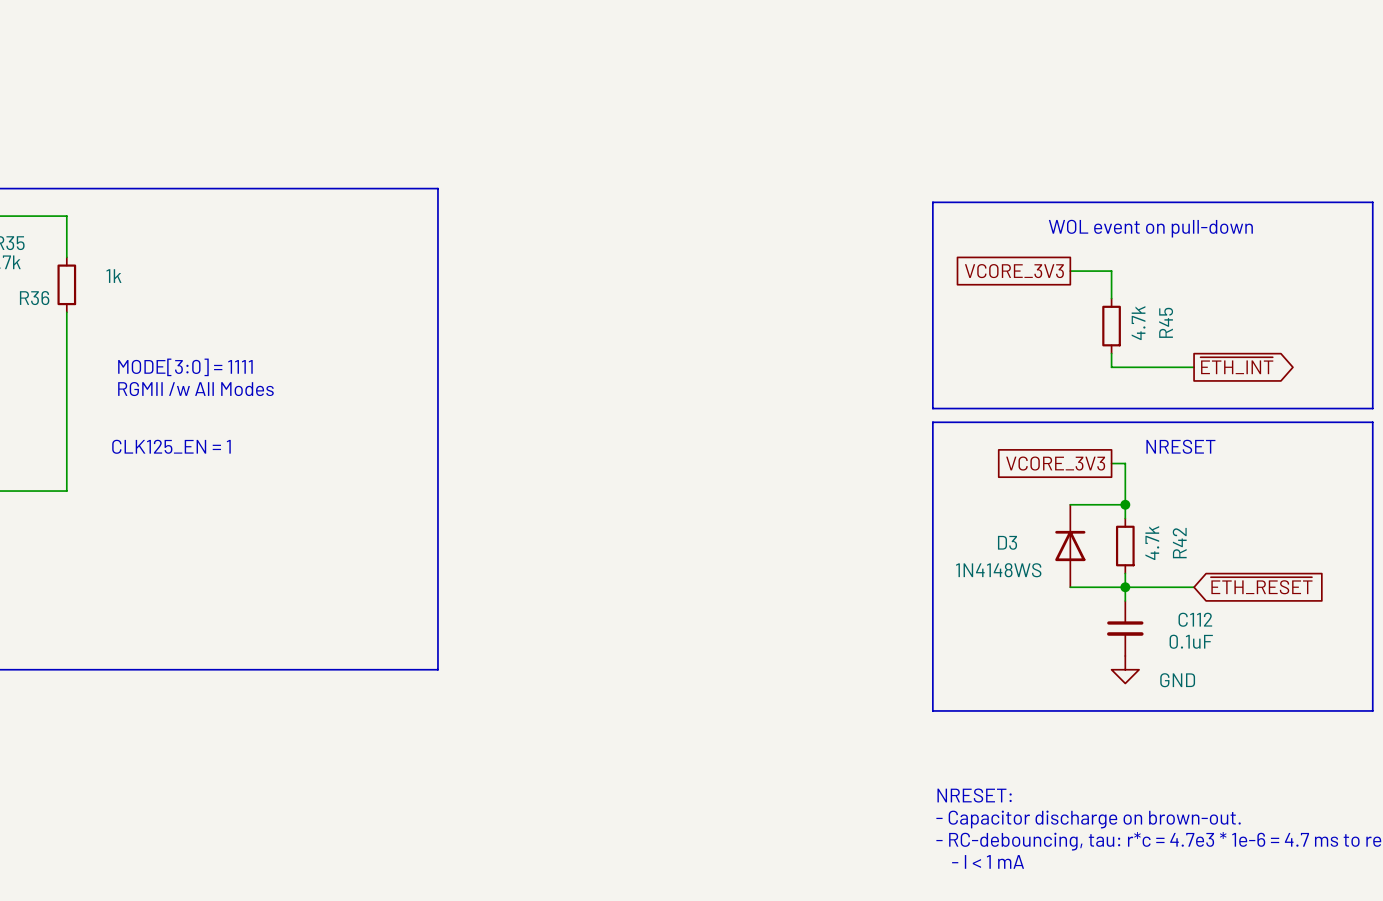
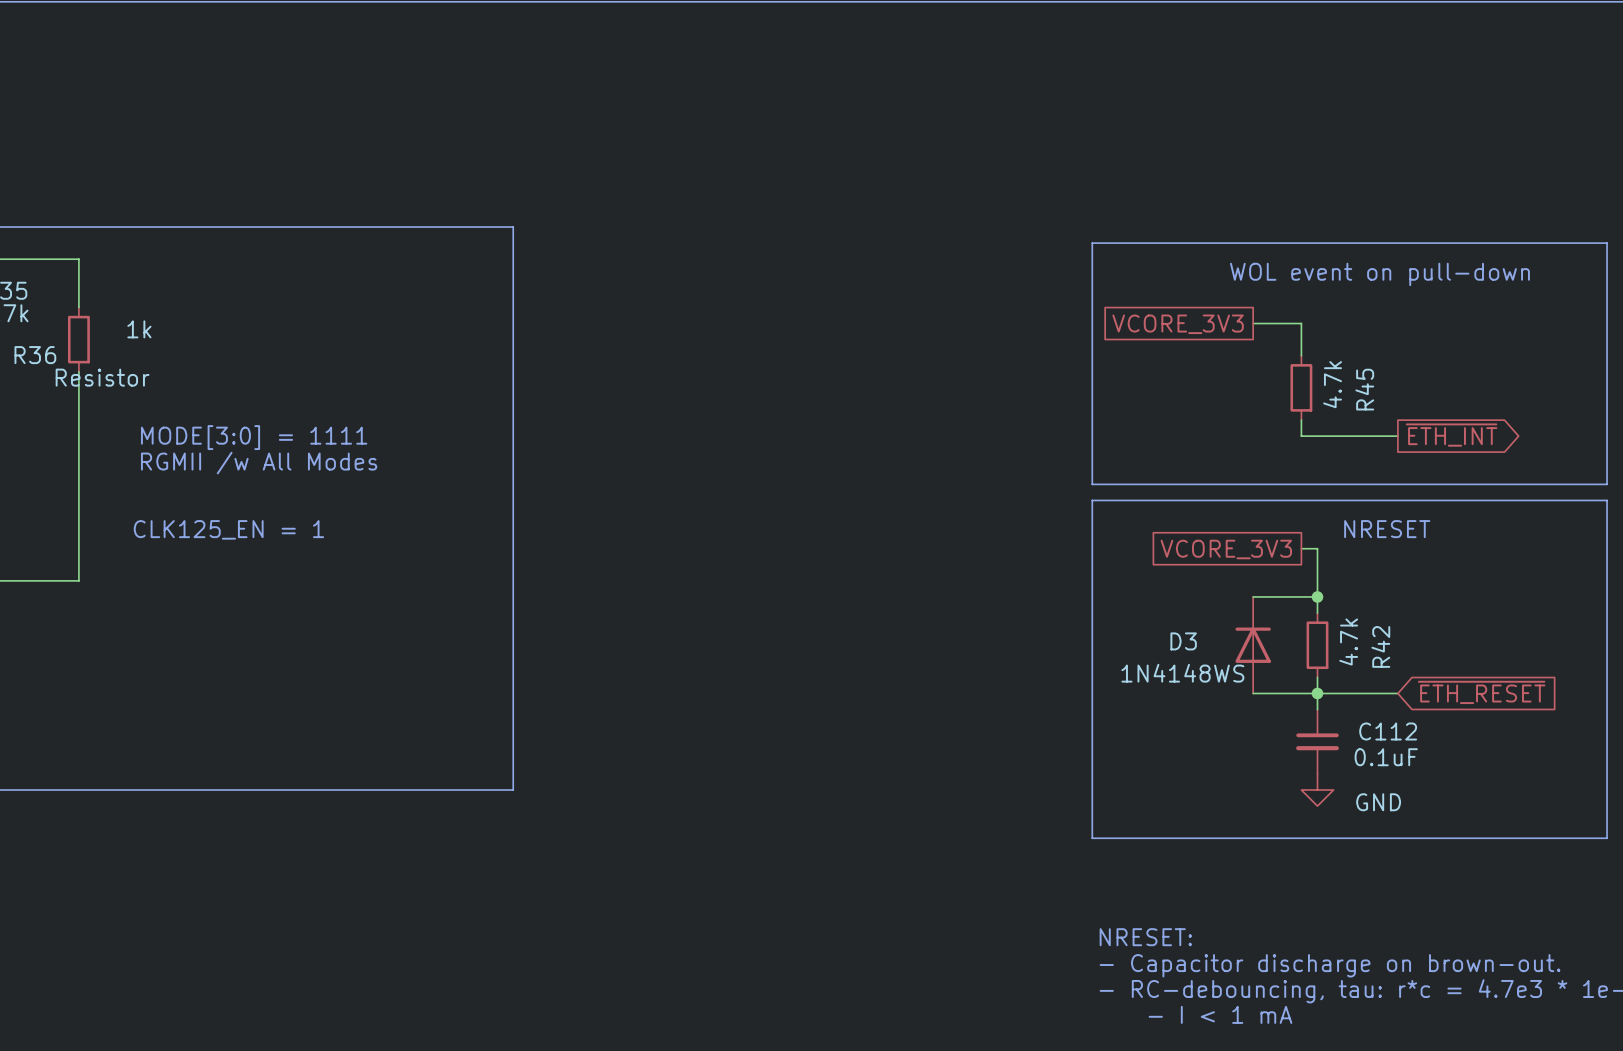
R36 text: none -> Resistor (102, 377)

